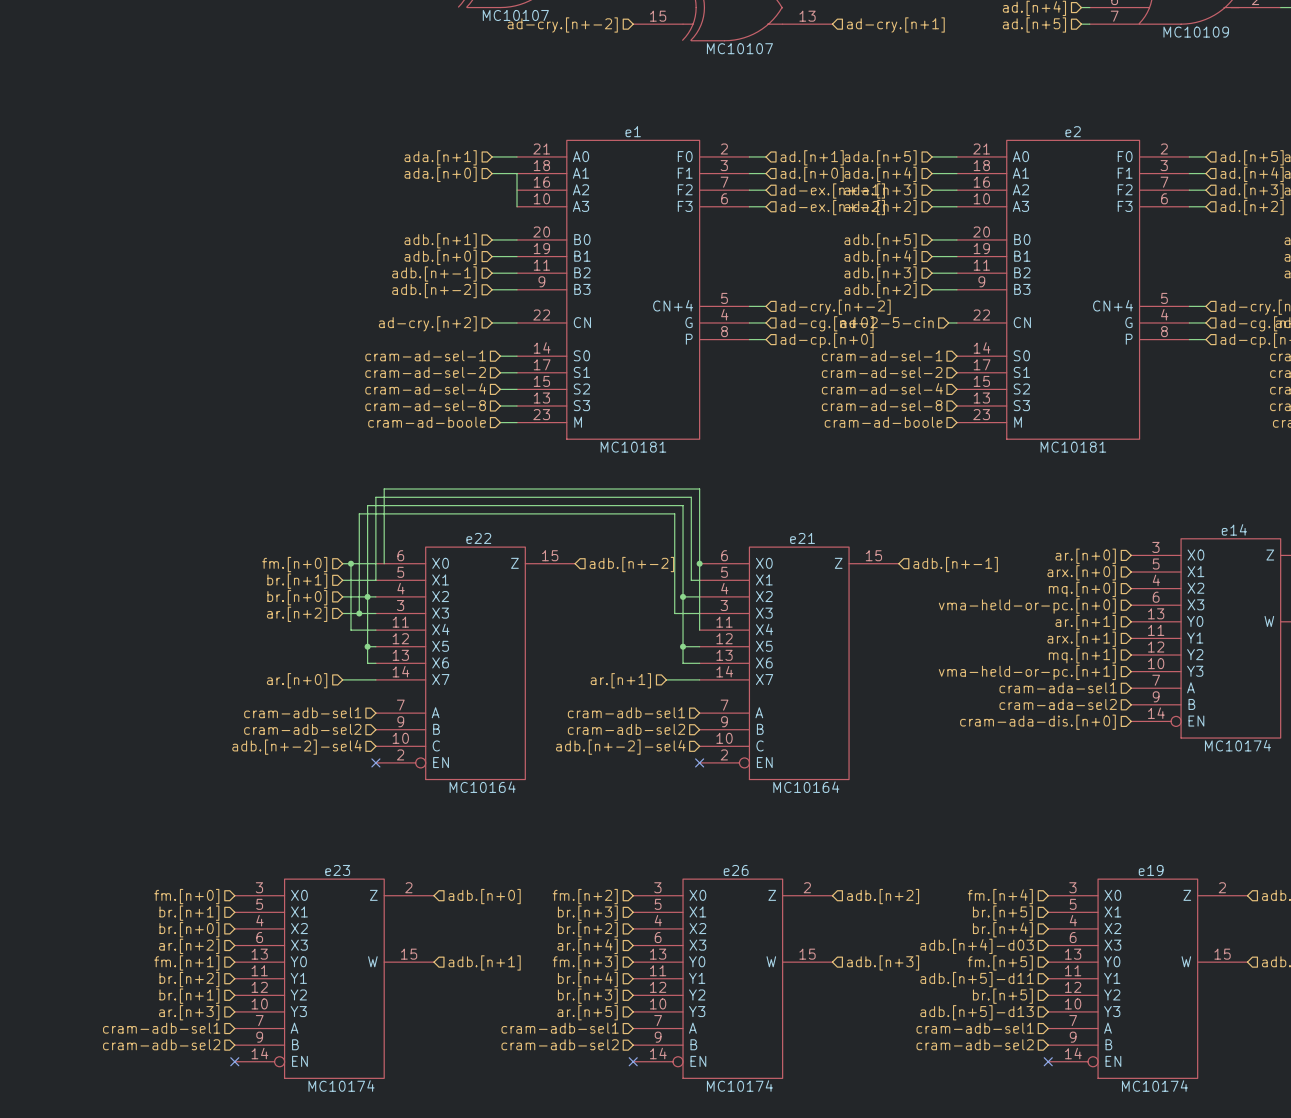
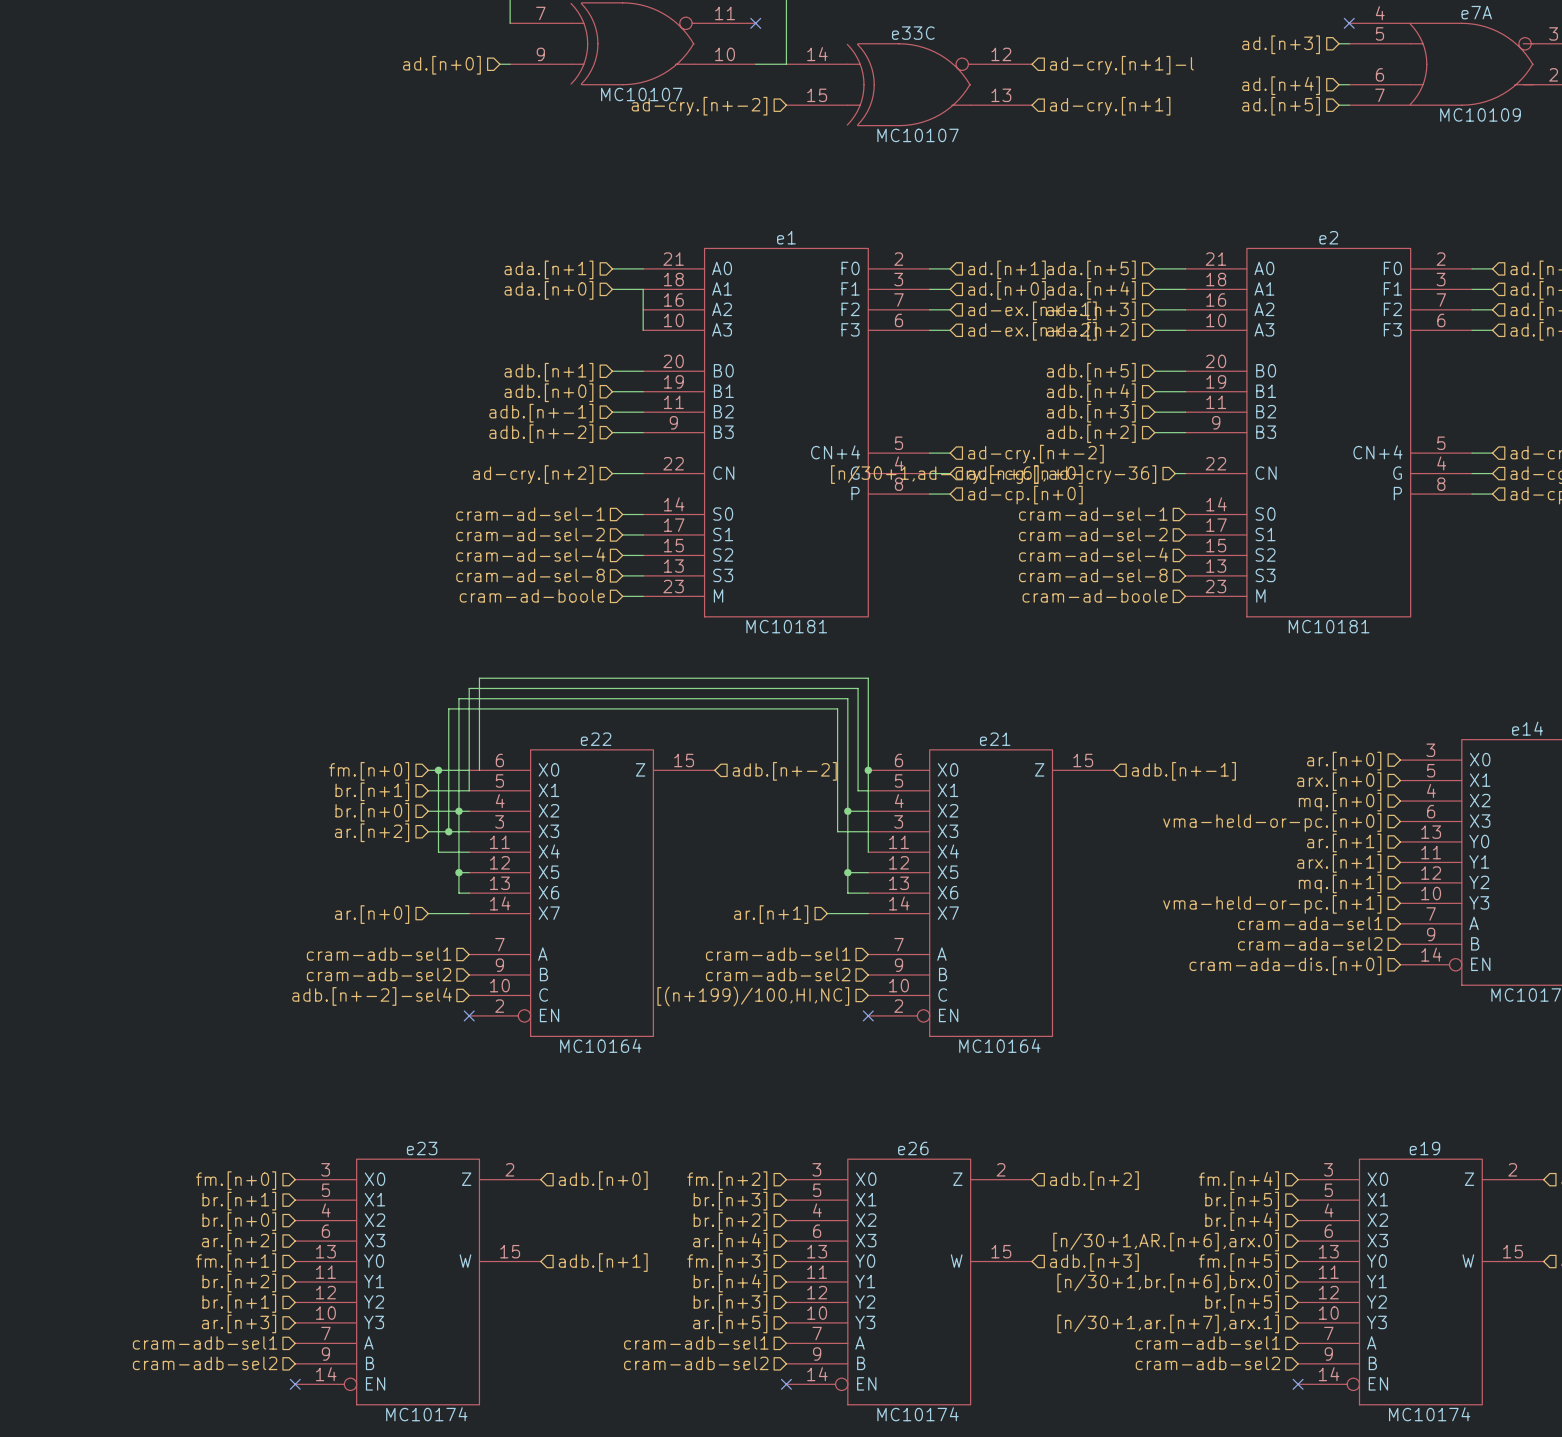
hierarchical label: ad-2-5-cin (887, 322) -> [n/30+1,ad-cry.[n+6],ad-cry-36] (993, 474)
hierarchical label: adb.[n+-2]-sel4 (620, 747) -> [(n+199)/100,HI,NC] (753, 996)
hierarchical label: adb.[n+4]-d03 (977, 946) -> [n/30+1,AR.[n+6],arx.0] (1166, 1242)
hierarchical label: adb.[n+5]-d11 (977, 979) -> [n/30+1,br.[n+6],brx.0] (1168, 1282)
hierarchical label: adb.[n+5]-d13 (977, 1012) -> [n/30+1,ar.[n+7],arx.1] (1168, 1323)

